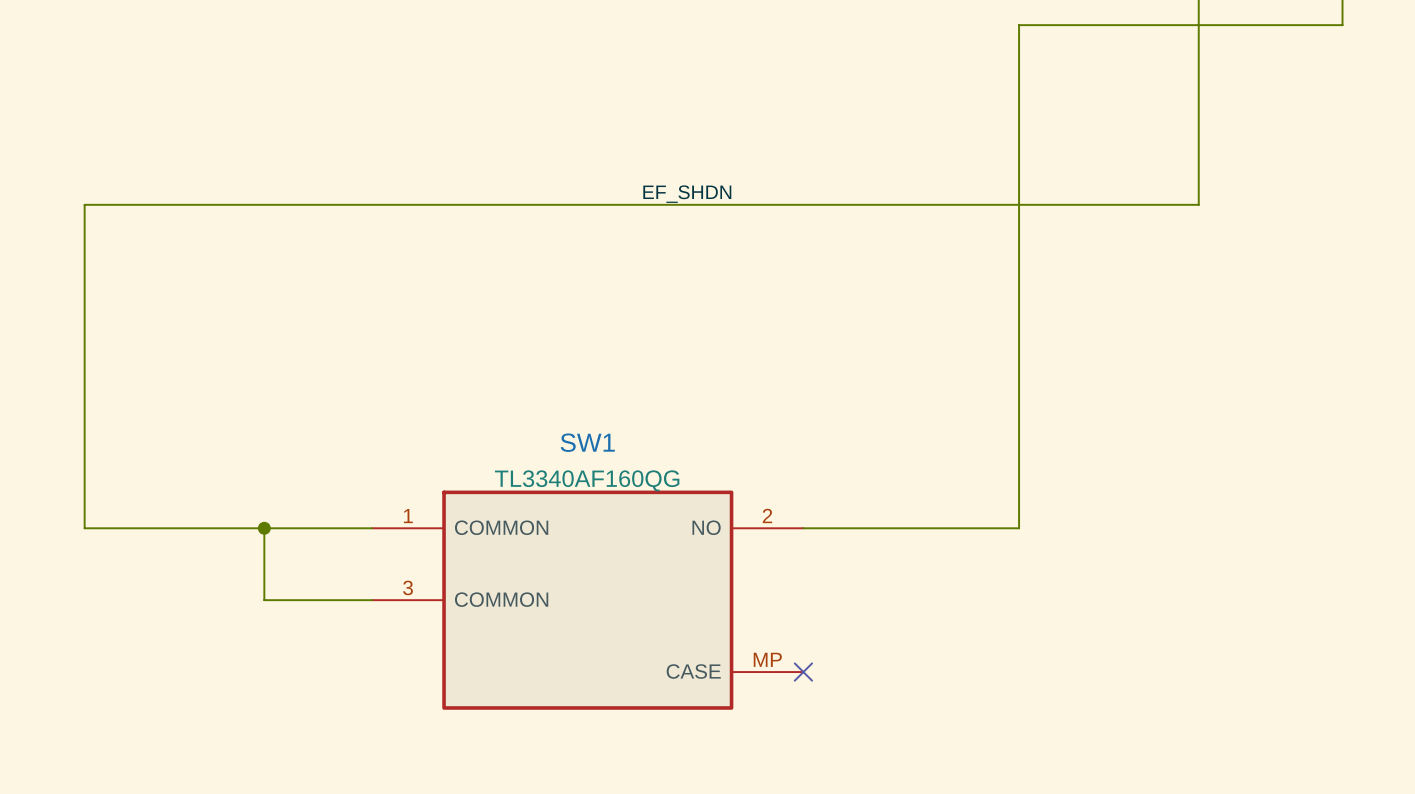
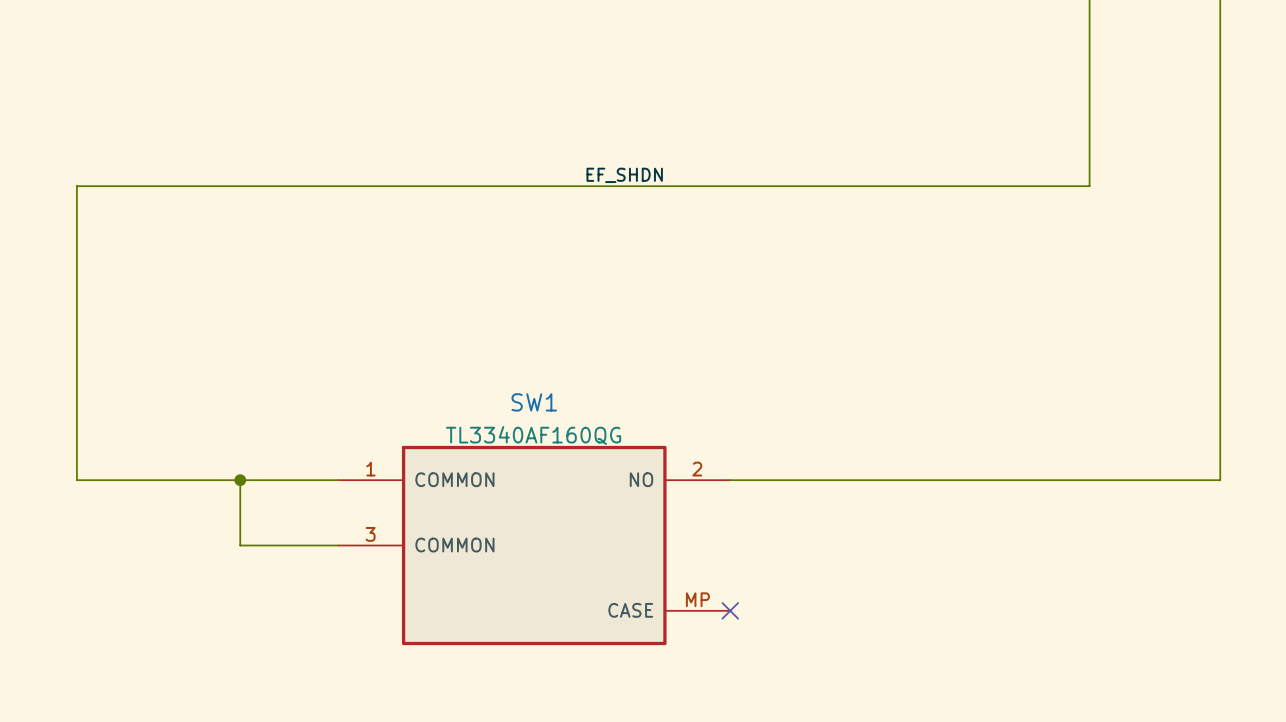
wire: (1342, 25) (1019, 25) (1019, 528) -> (1220, 22) (1220, 480) (926, 480)

